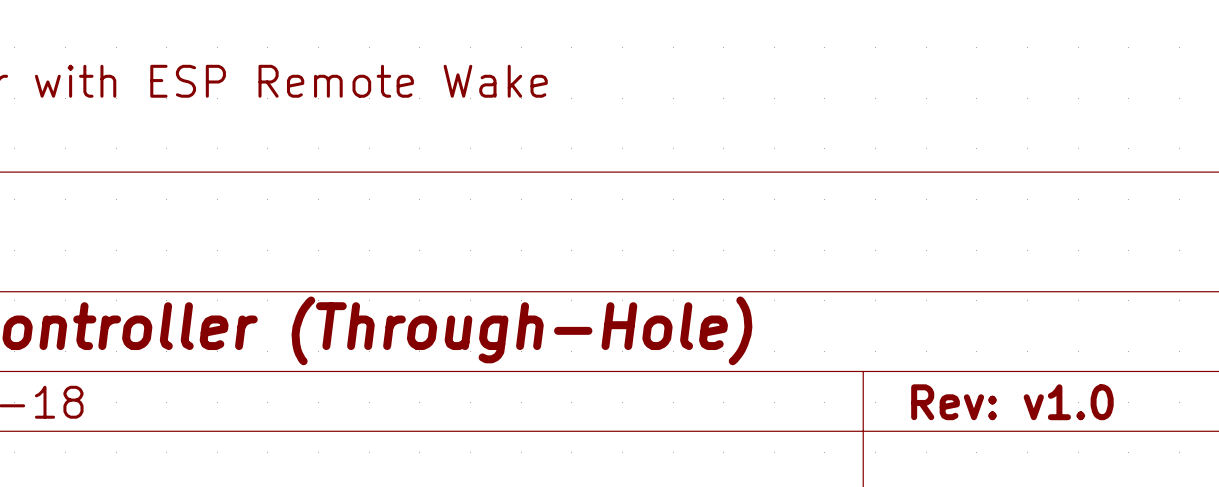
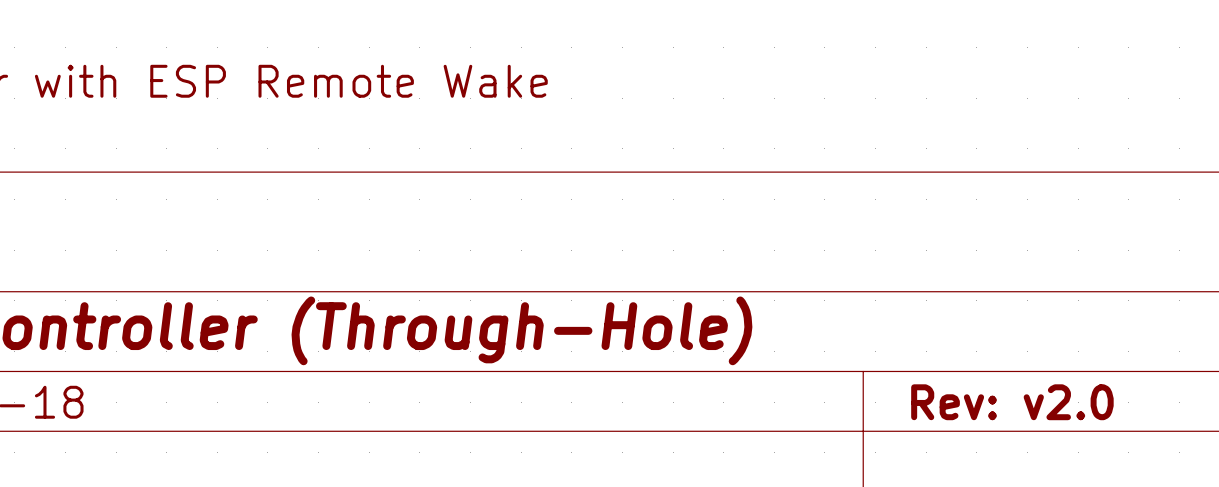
title block: Rev: v1.0 (1012, 402) -> Rev: v2.0 (1012, 402)

